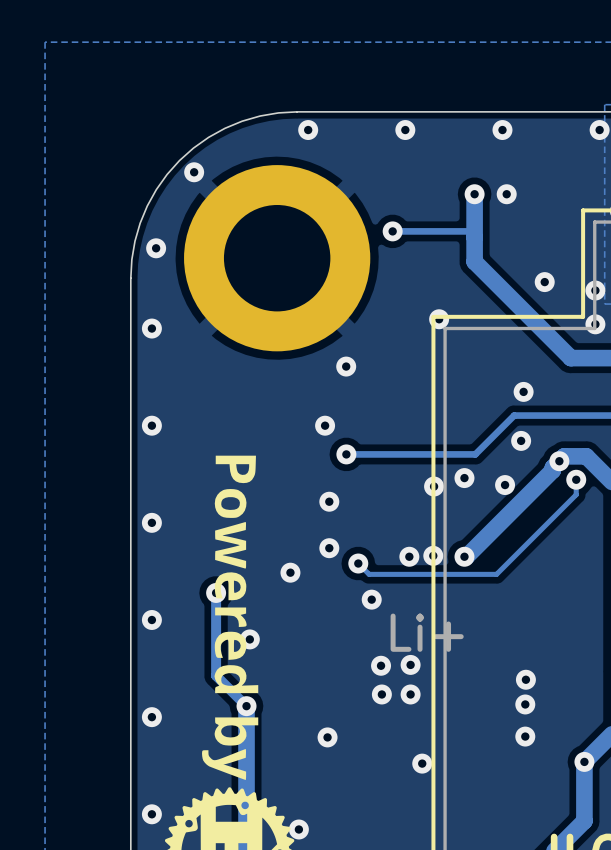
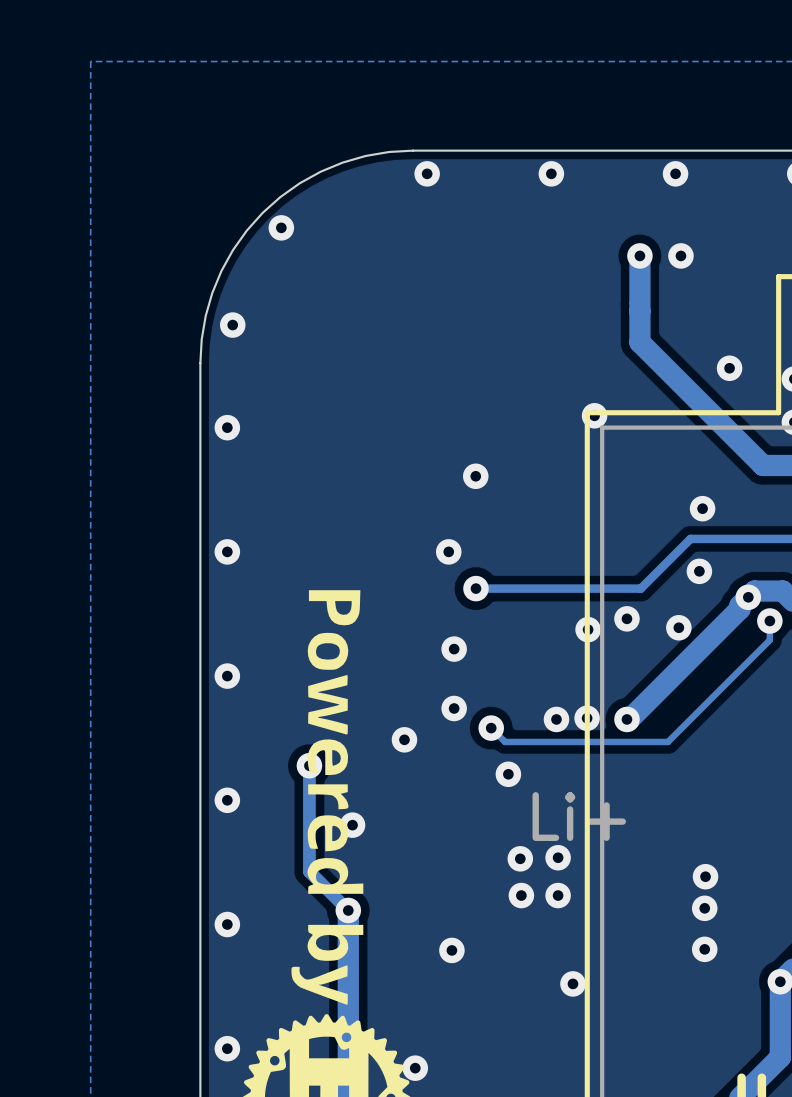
via: (392, 231) -> none
track: (468, 231) (392, 231) -> none
part: (277, 258) -> none

